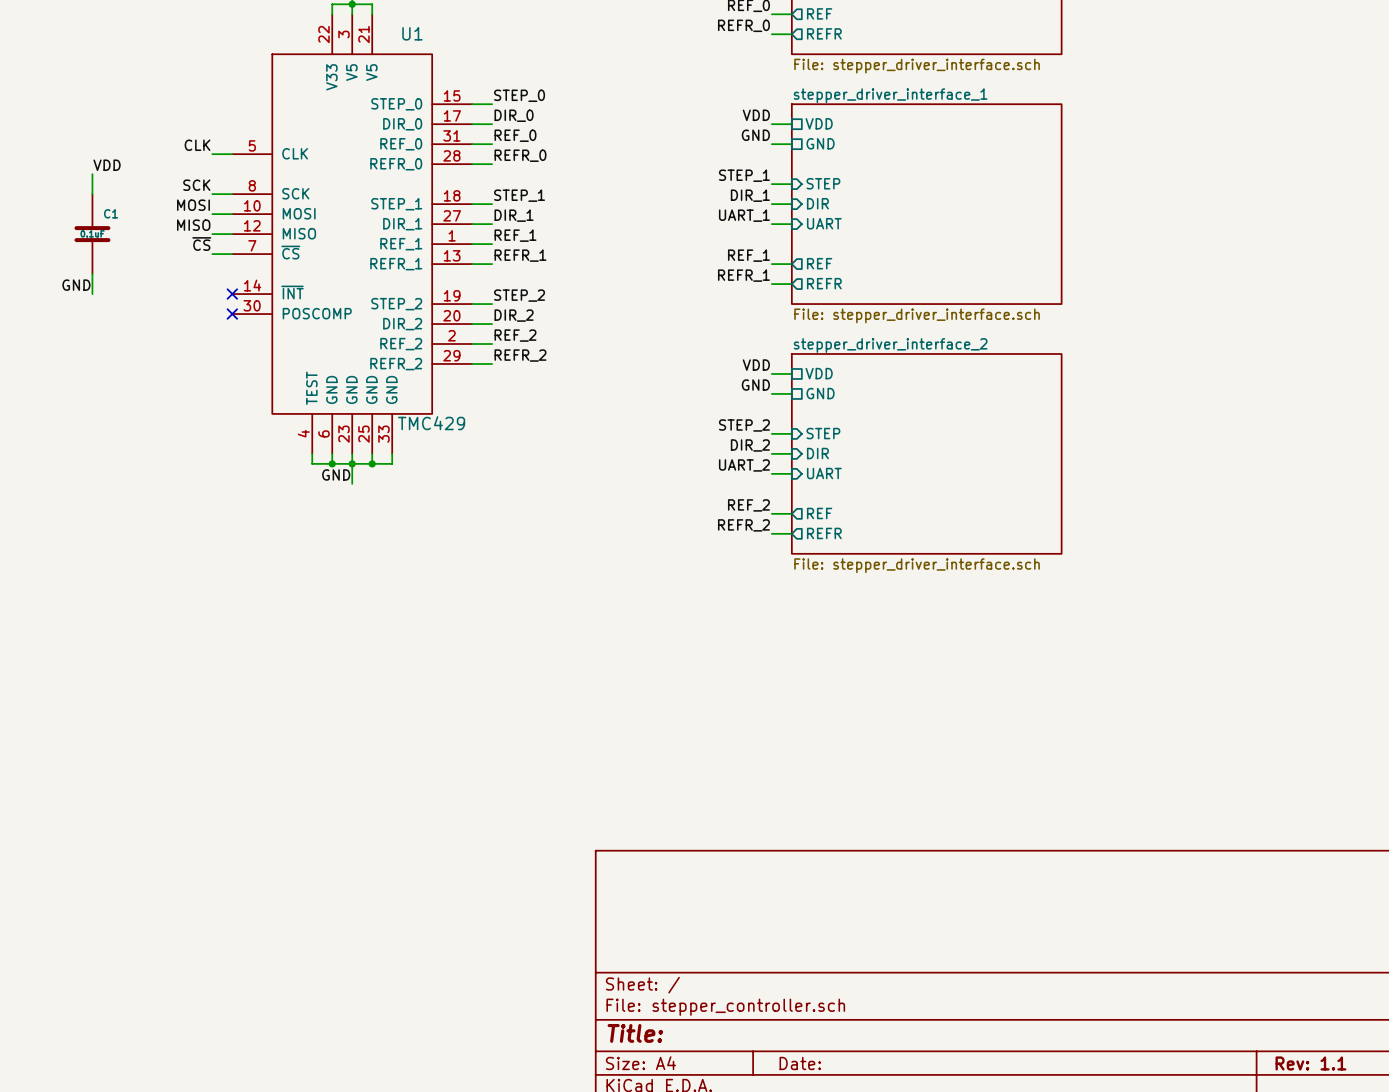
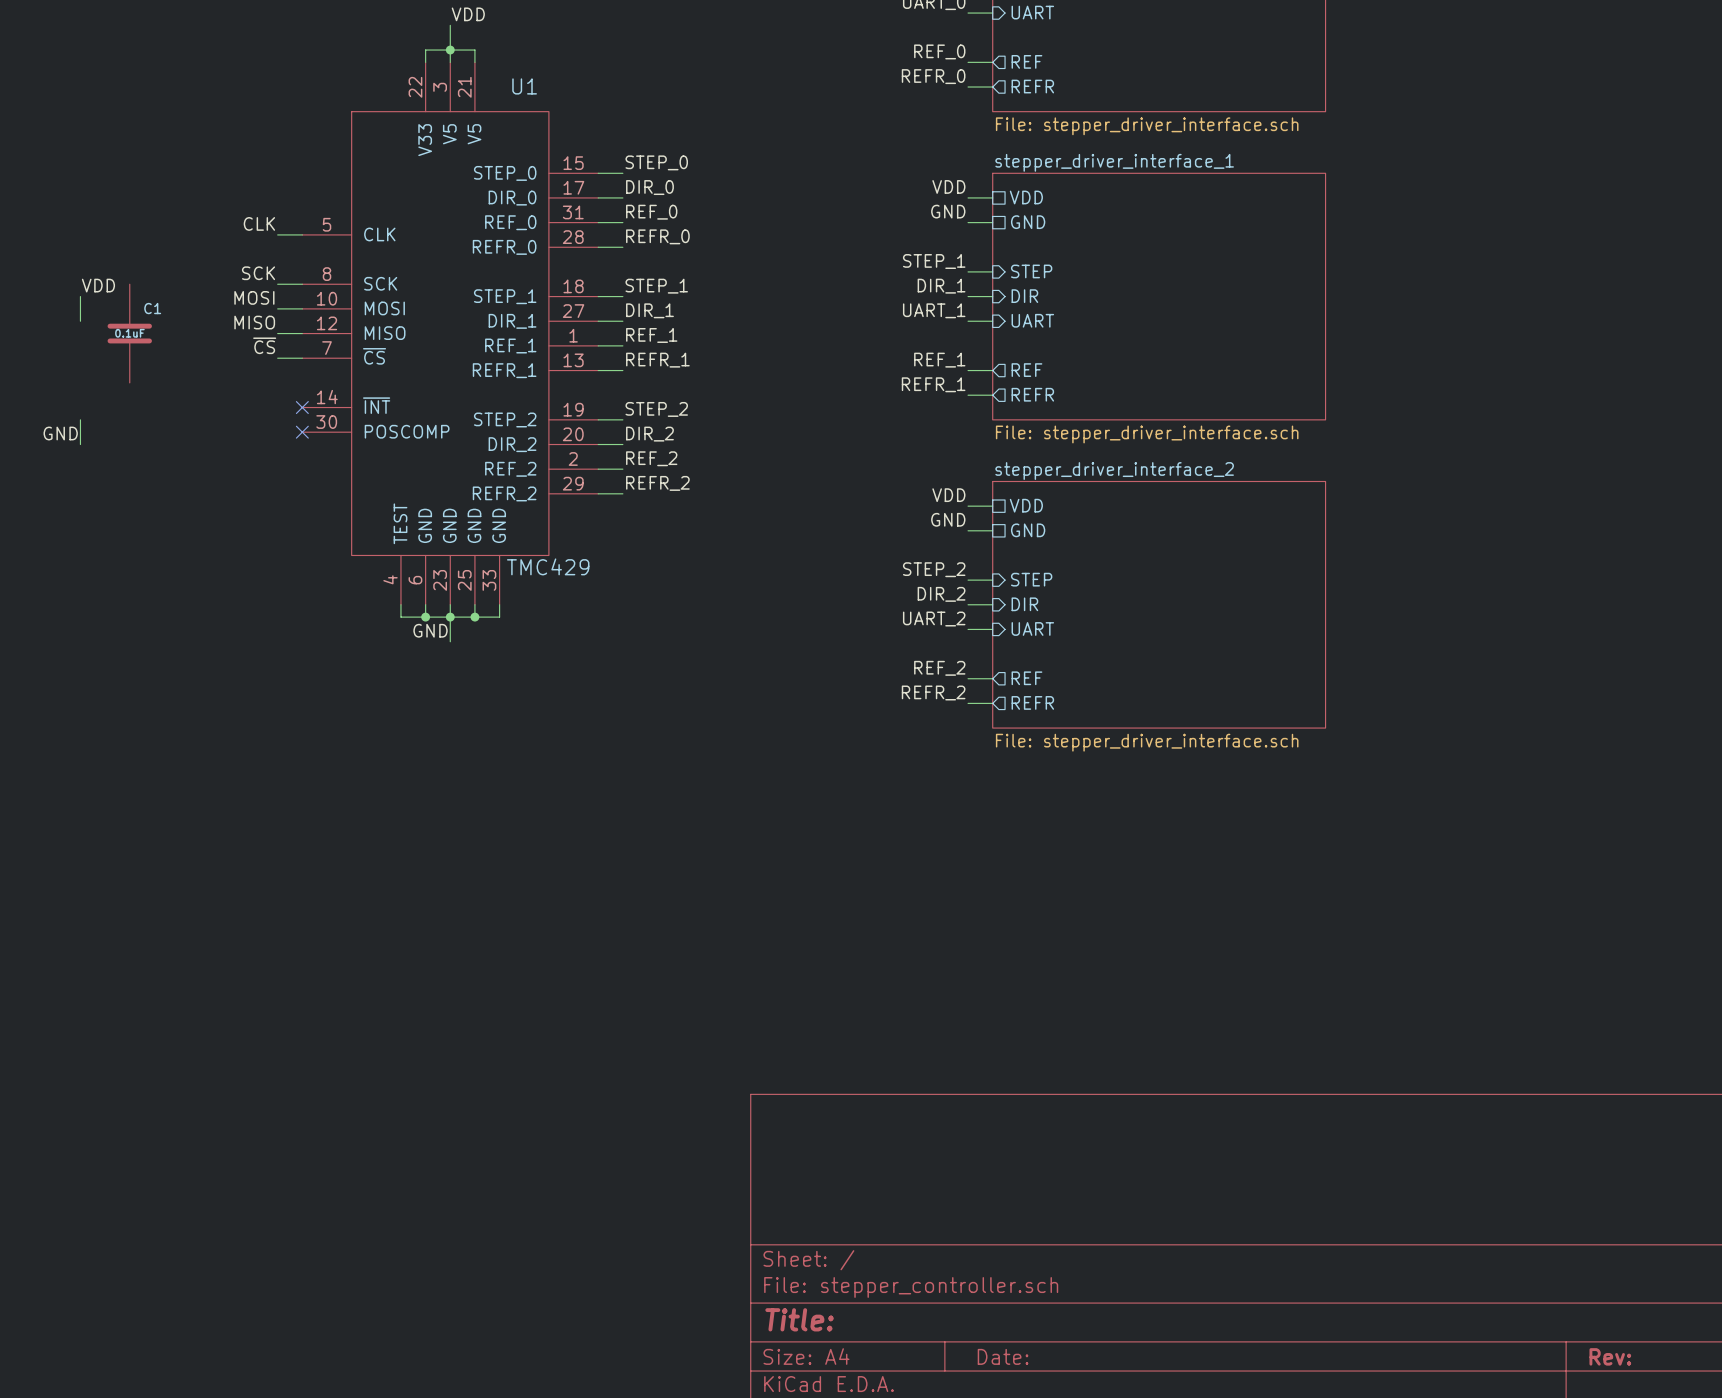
label position: VDD (107, 165) -> VDD (98, 285)
wire: (92, 174) (92, 194) -> (80, 296) (80, 321)
wire: (92, 274) (92, 294) -> (80, 419) (80, 444)
label position: GND (76, 285) -> GND (60, 433)
title block: Rev: 1.1 (1310, 1063) -> Rev: (1610, 1356)

